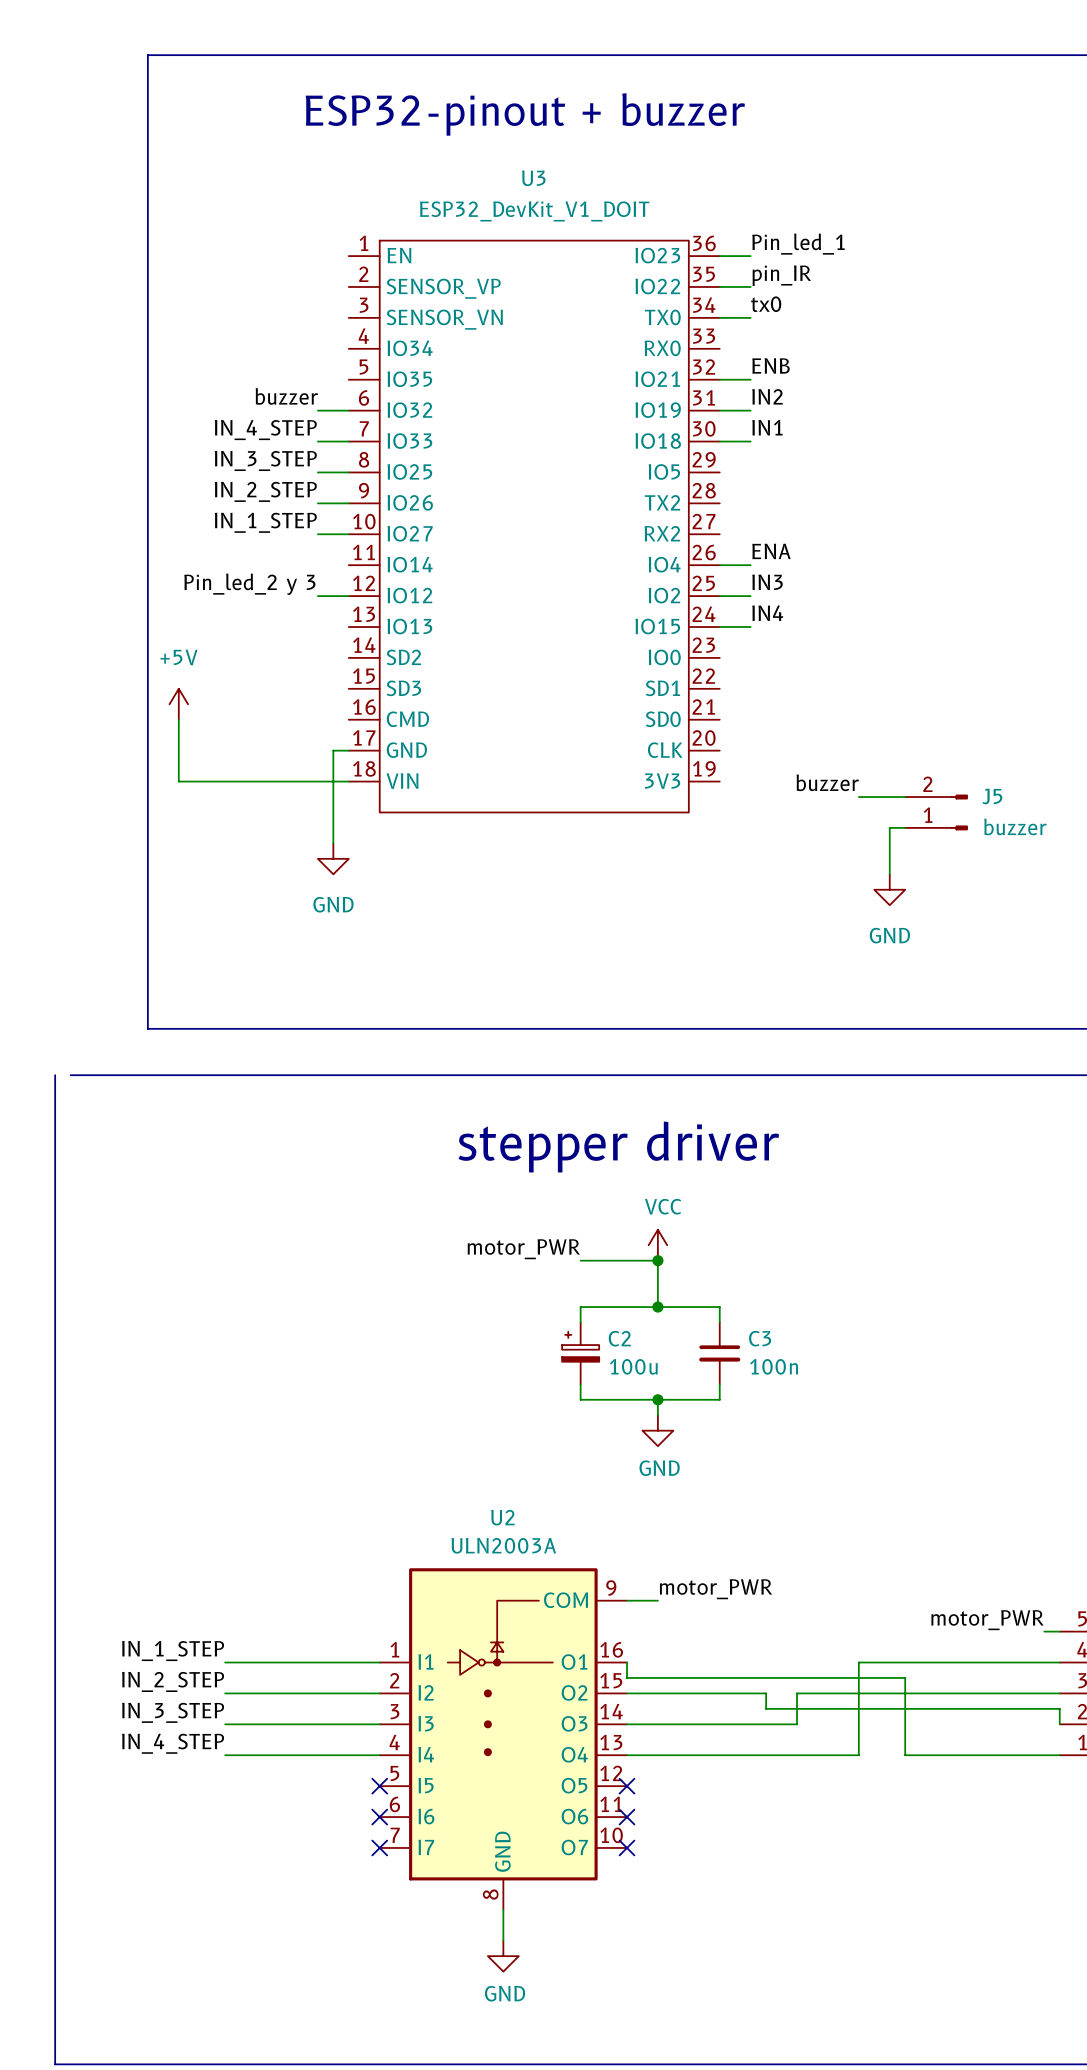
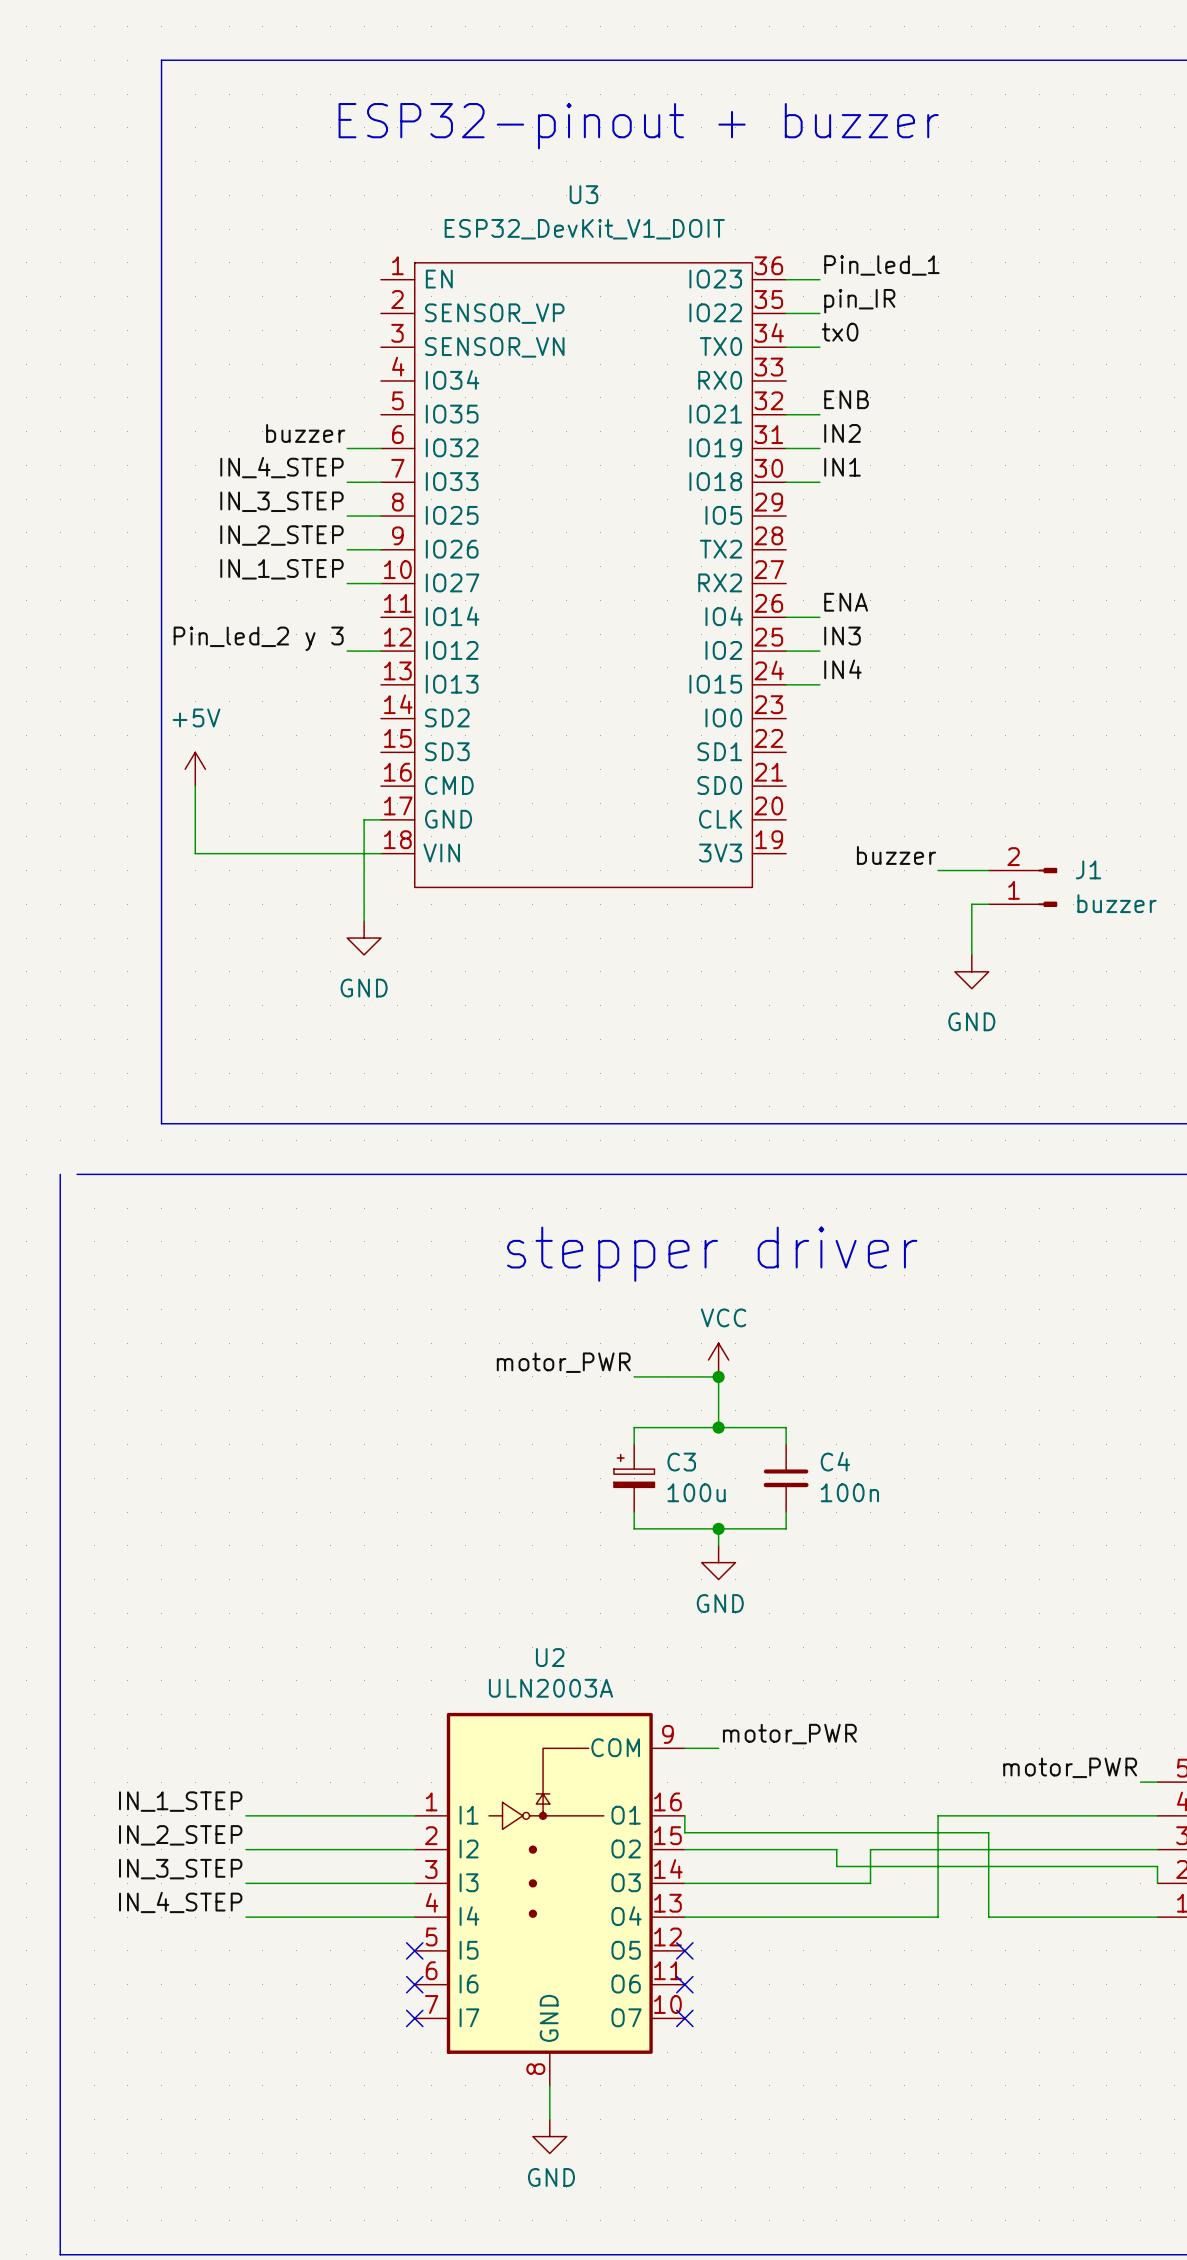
J5 name: J5 (992, 796) -> J1 (1088, 869)
C2 name: C2 (619, 1338) -> C3 (681, 1462)
C3 name: C3 (760, 1338) -> C4 (835, 1461)

